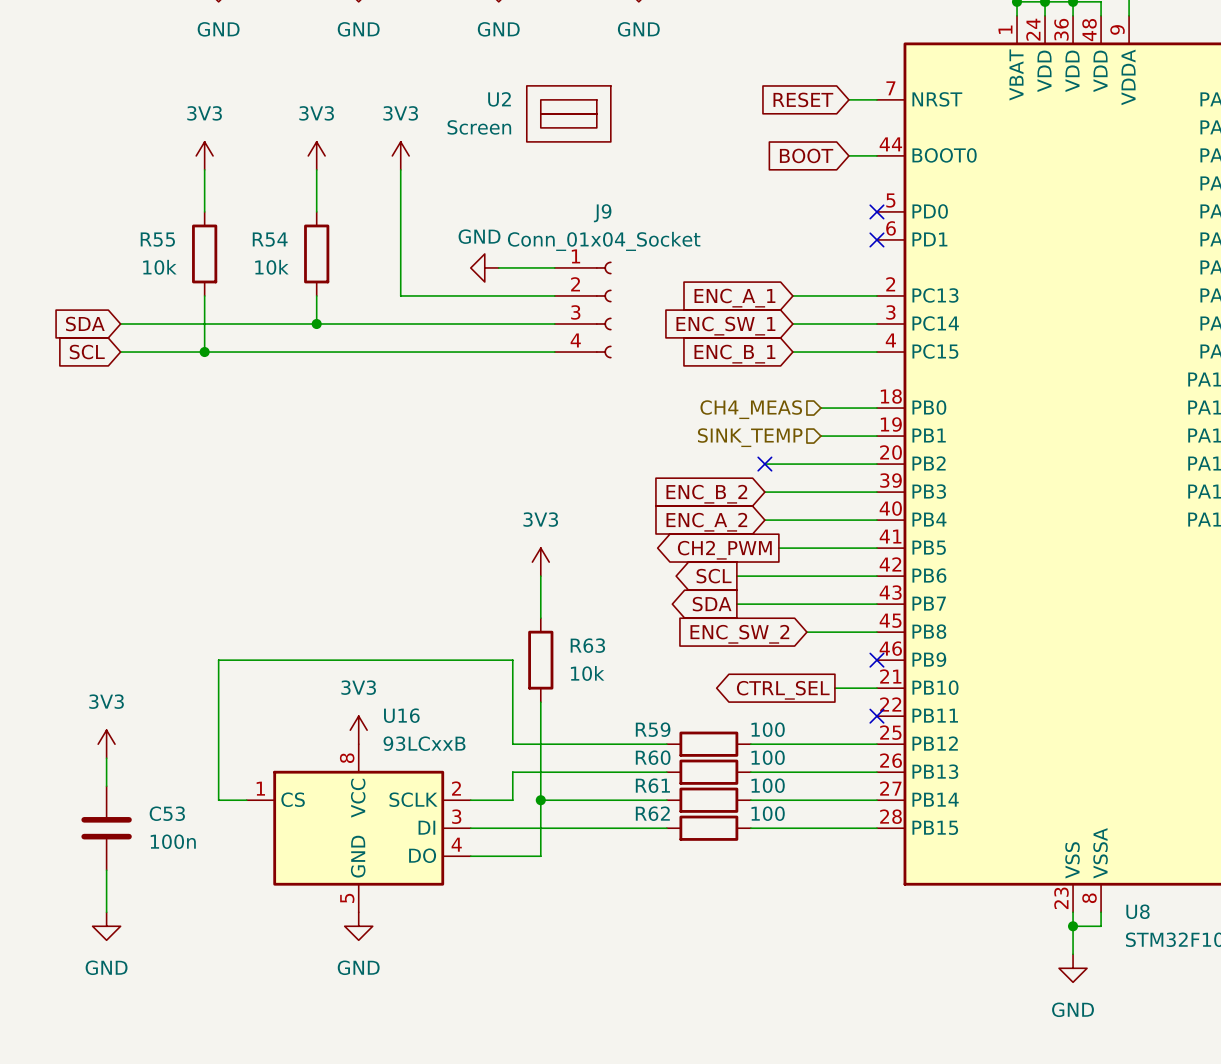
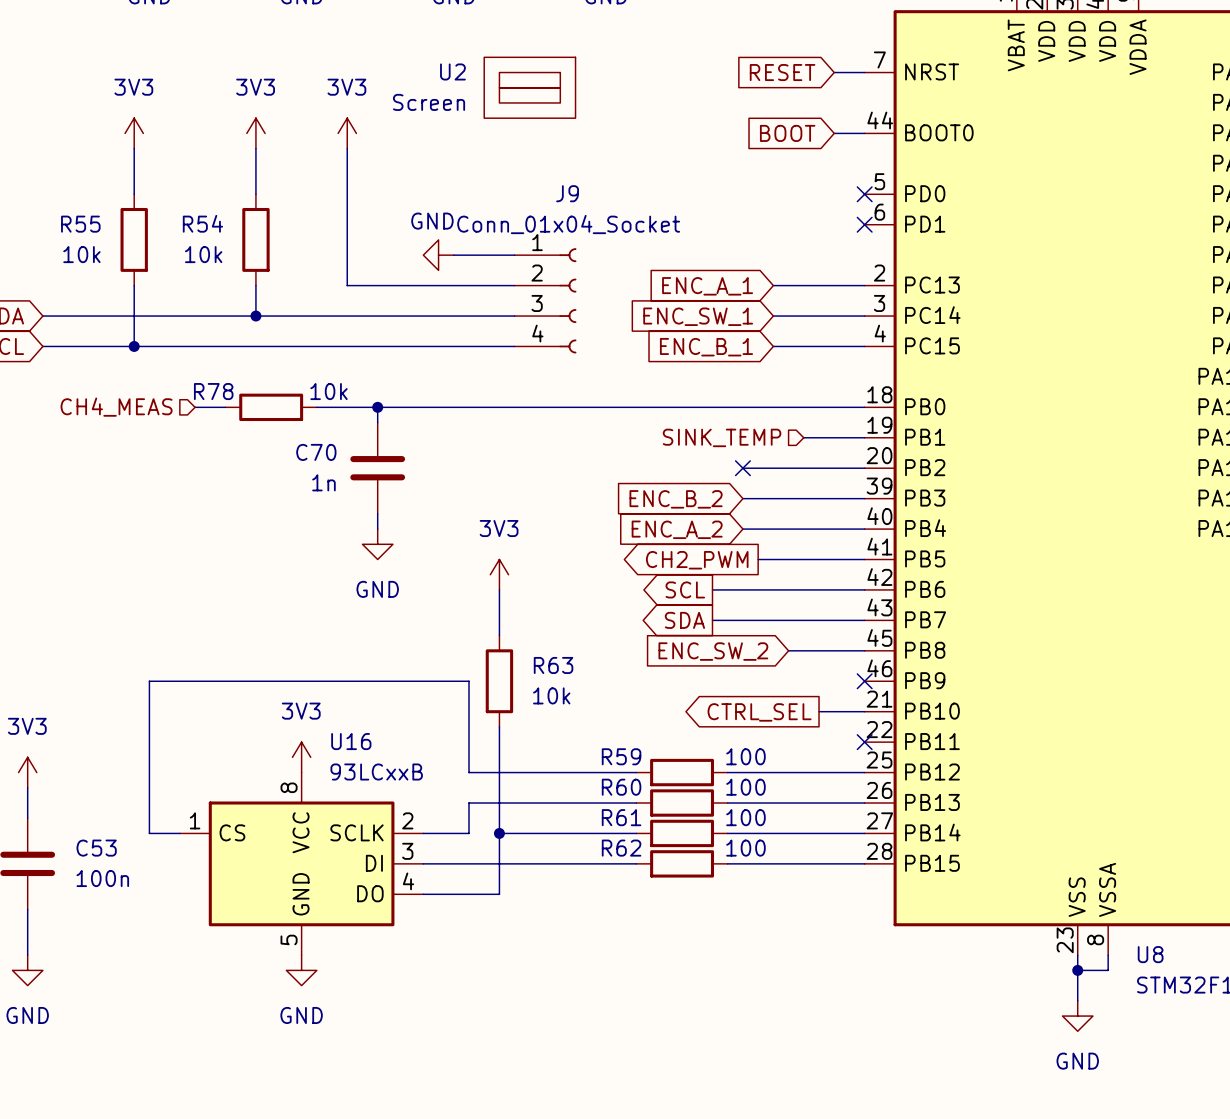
wire: none -> (195, 407) (225, 407)
R78: none -> 10k (271, 407)
wire: none -> (316, 407) (803, 407)
wire: none -> (377, 407) (377, 422)
junction: none -> (377, 407)
hierarchical label: none -> CH4_MEAS (116, 407)
hierarchical label: CH4_MEAS (751, 409) -> none
C70: none -> 1n (377, 468)
wire: none -> (377, 513) (377, 529)
power symbol: none -> GND (377, 544)

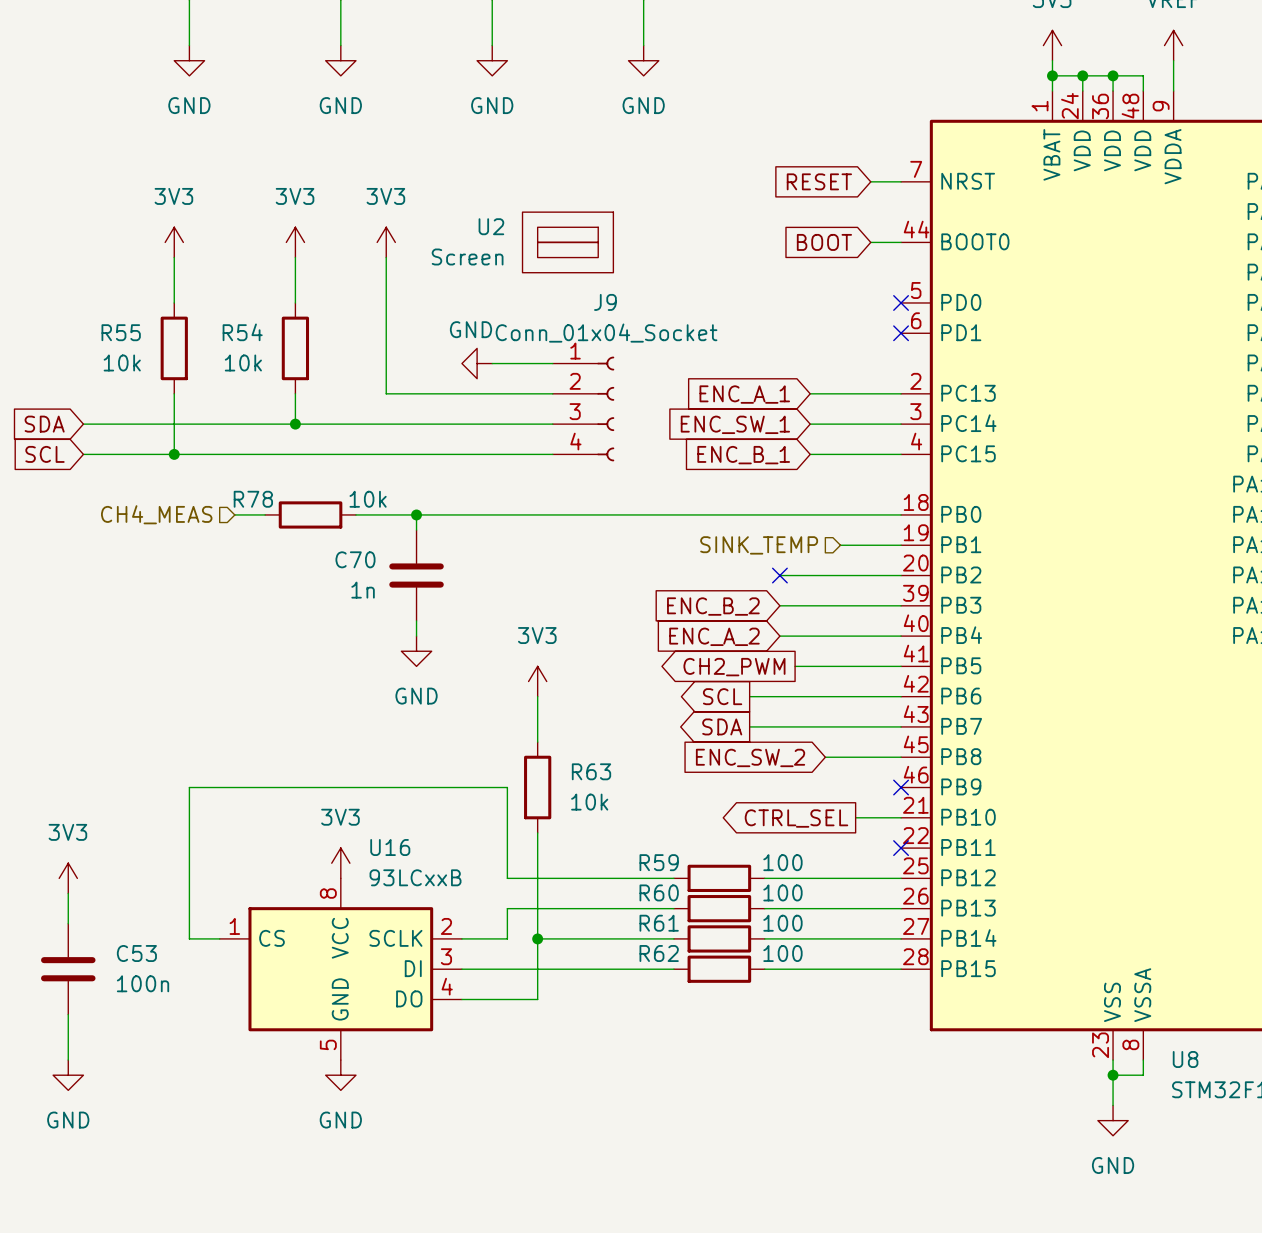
U2 position: (529, 87) -> (567, 242)

